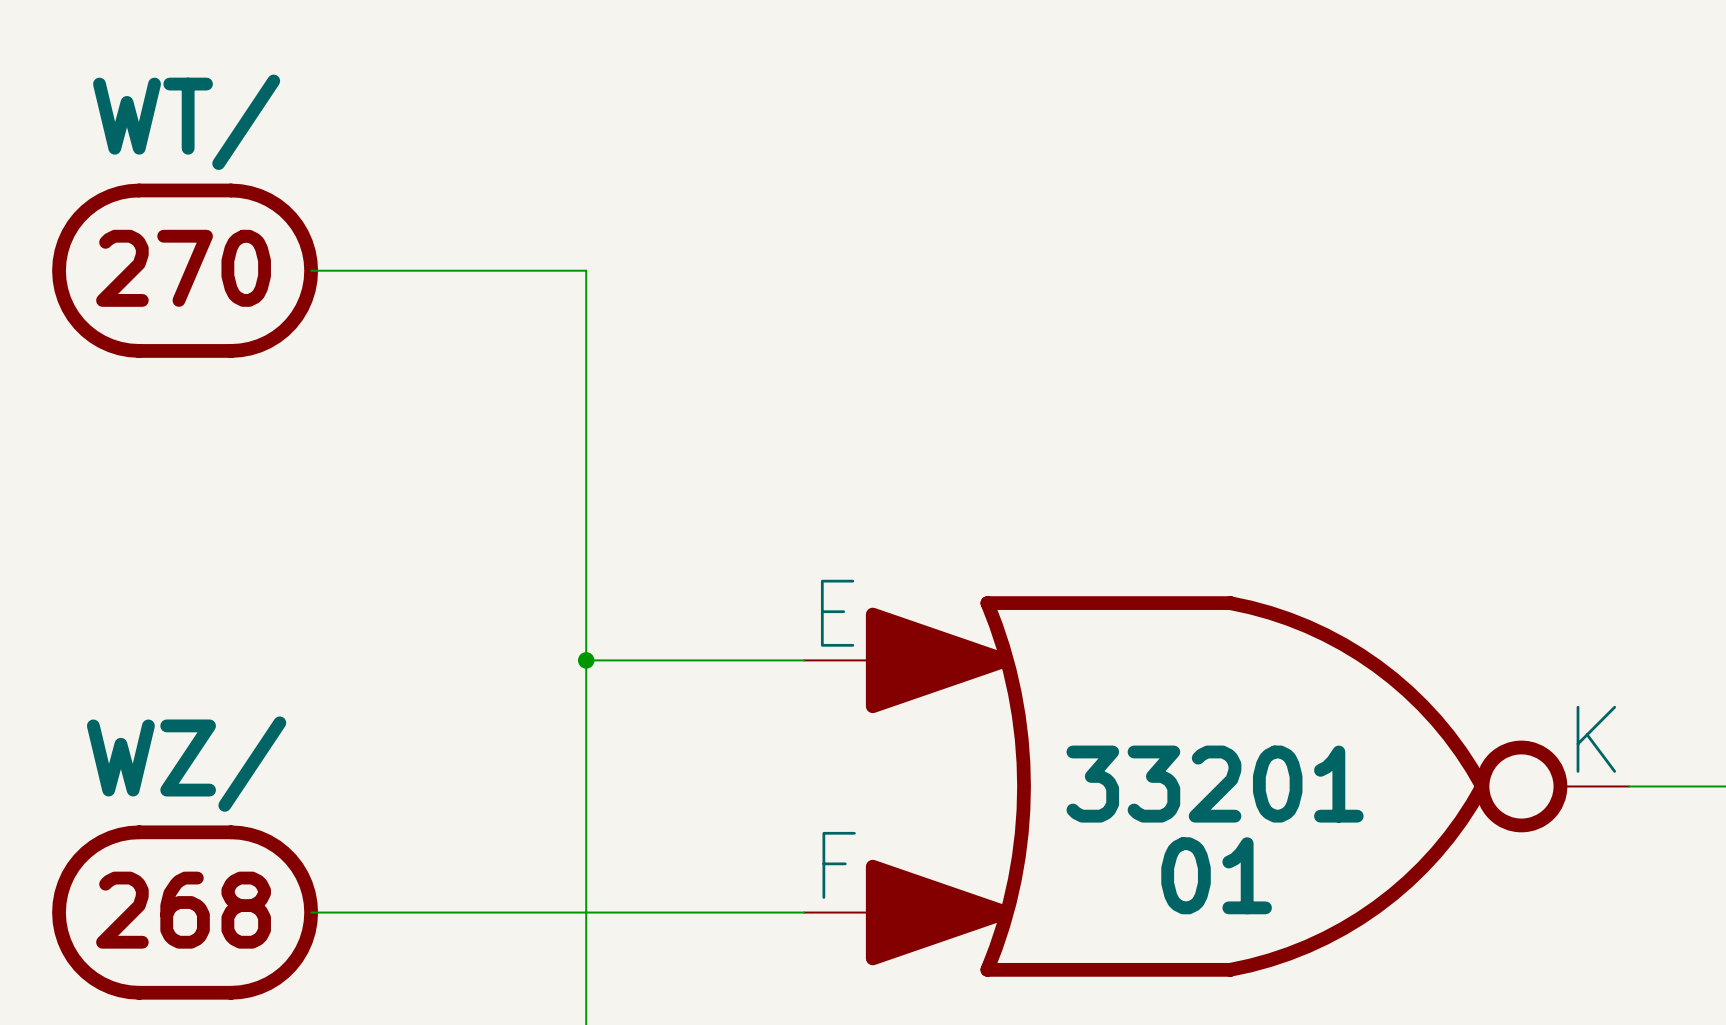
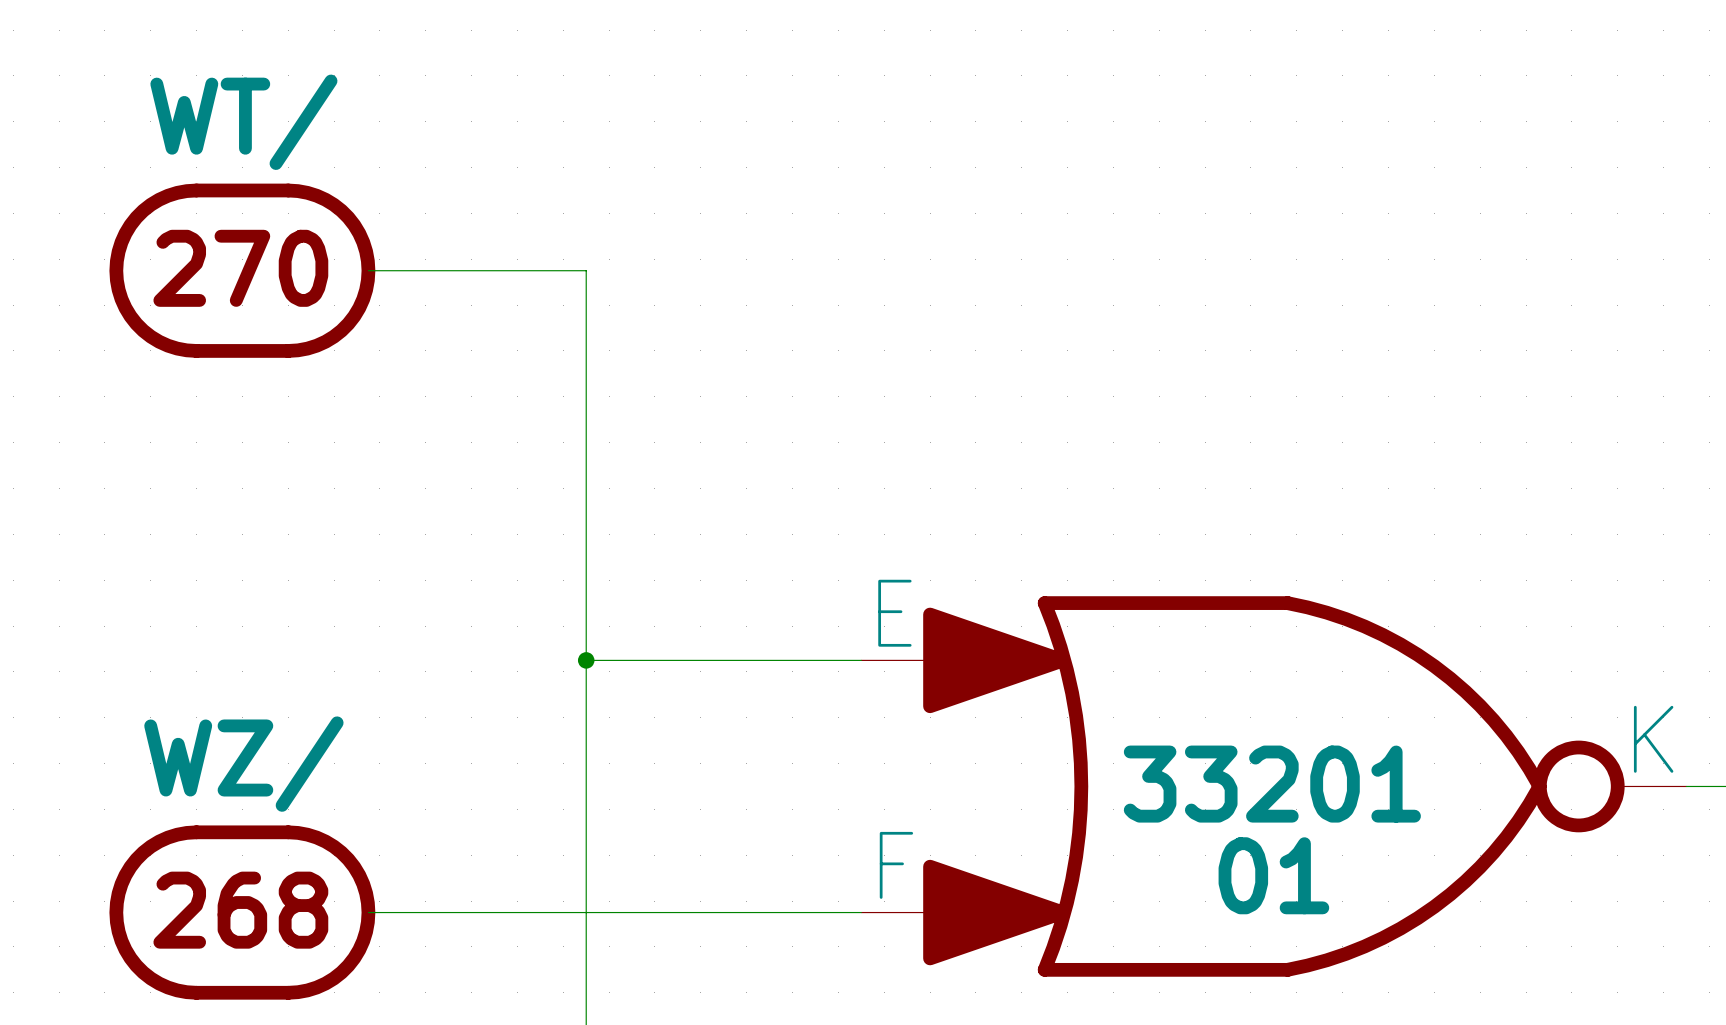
part position: (185, 270) -> (242, 270)
wire: (311, 270) (368, 270) -> none
part position: (1216, 786) -> (1273, 786)
part position: (185, 912) -> (242, 912)
wire: (311, 912) (368, 912) -> none

